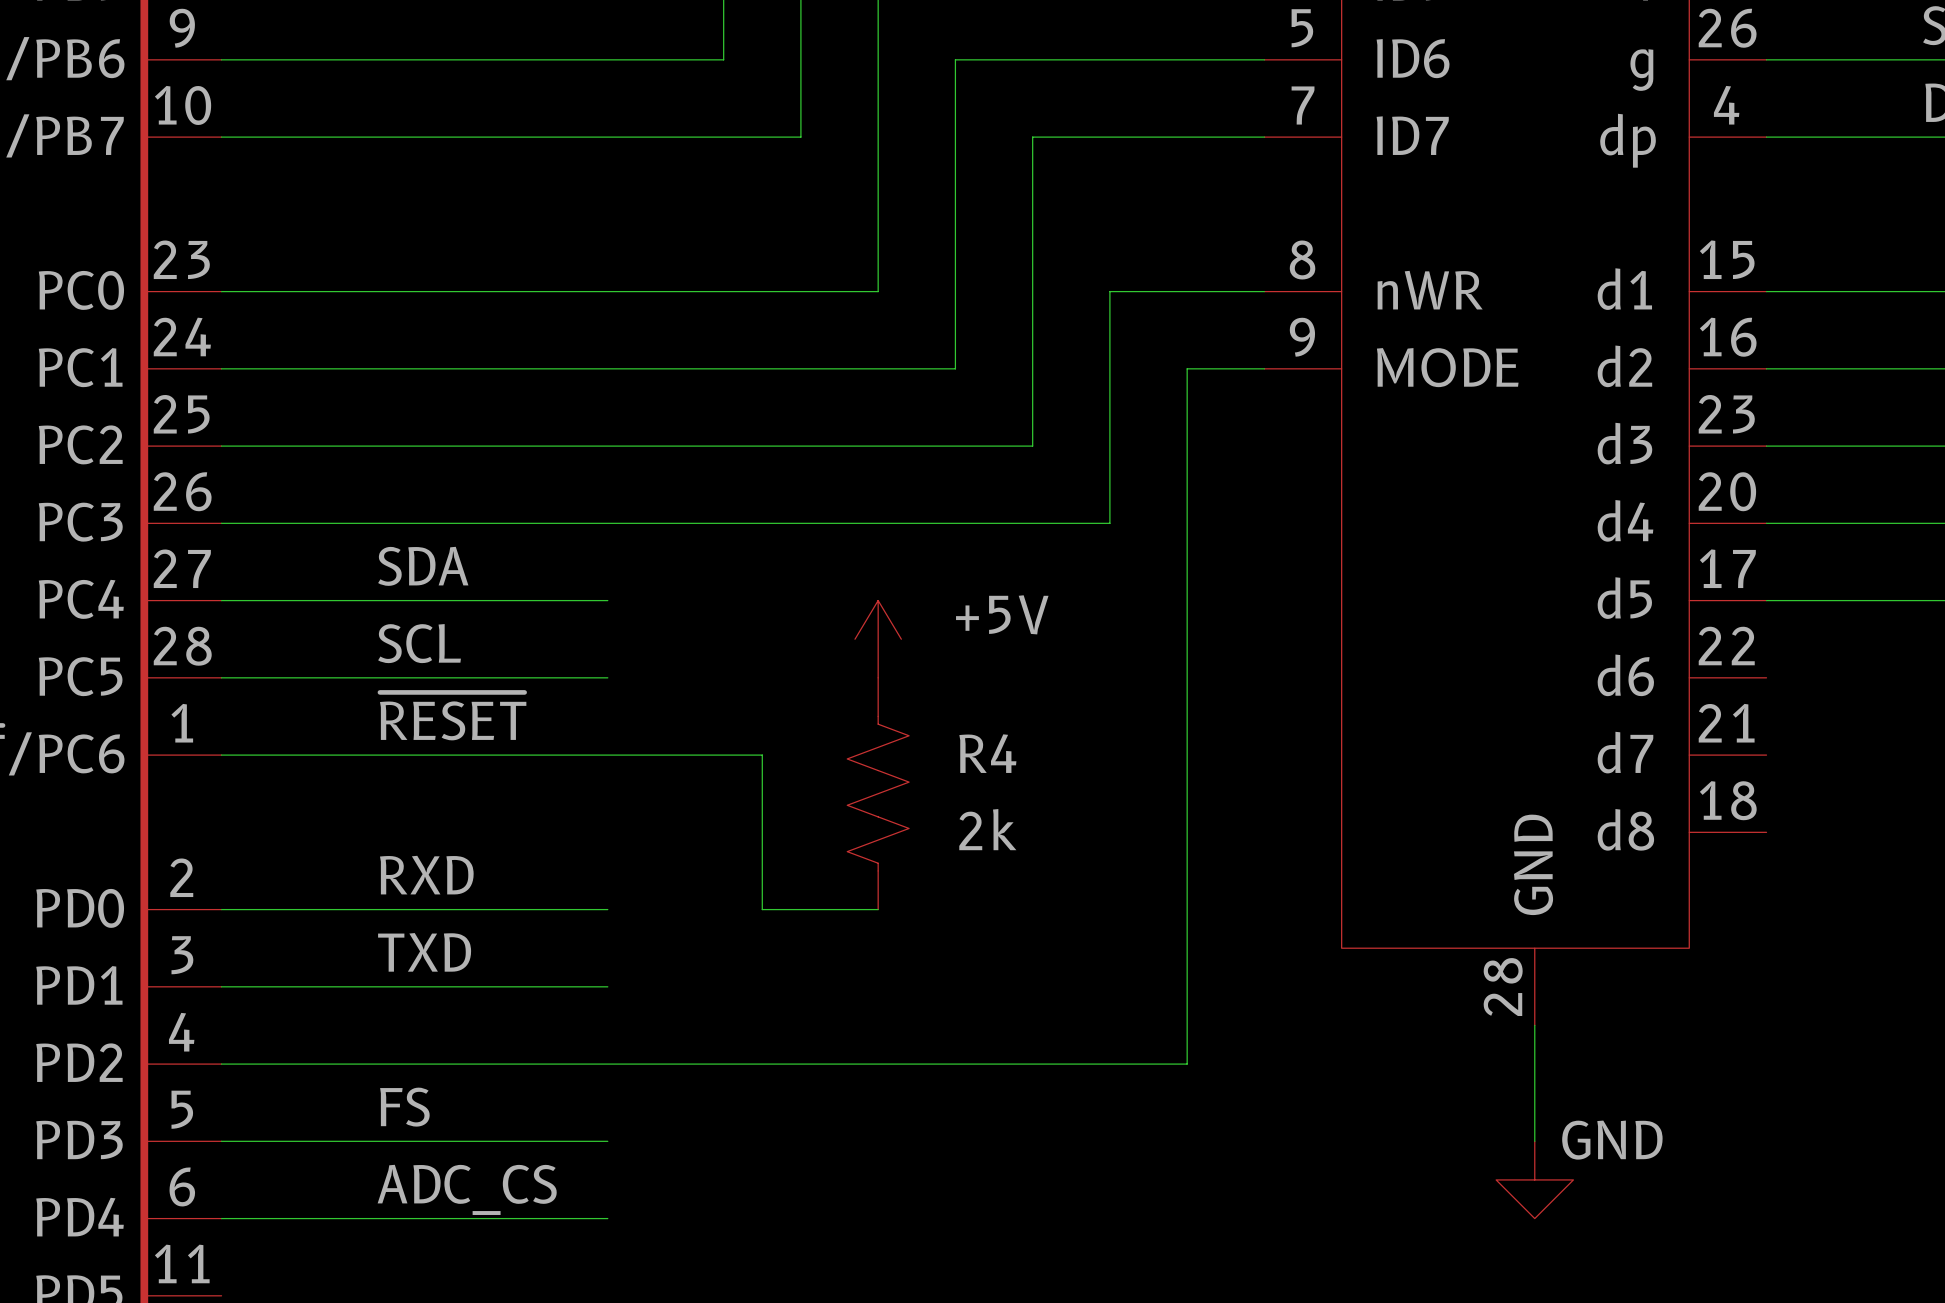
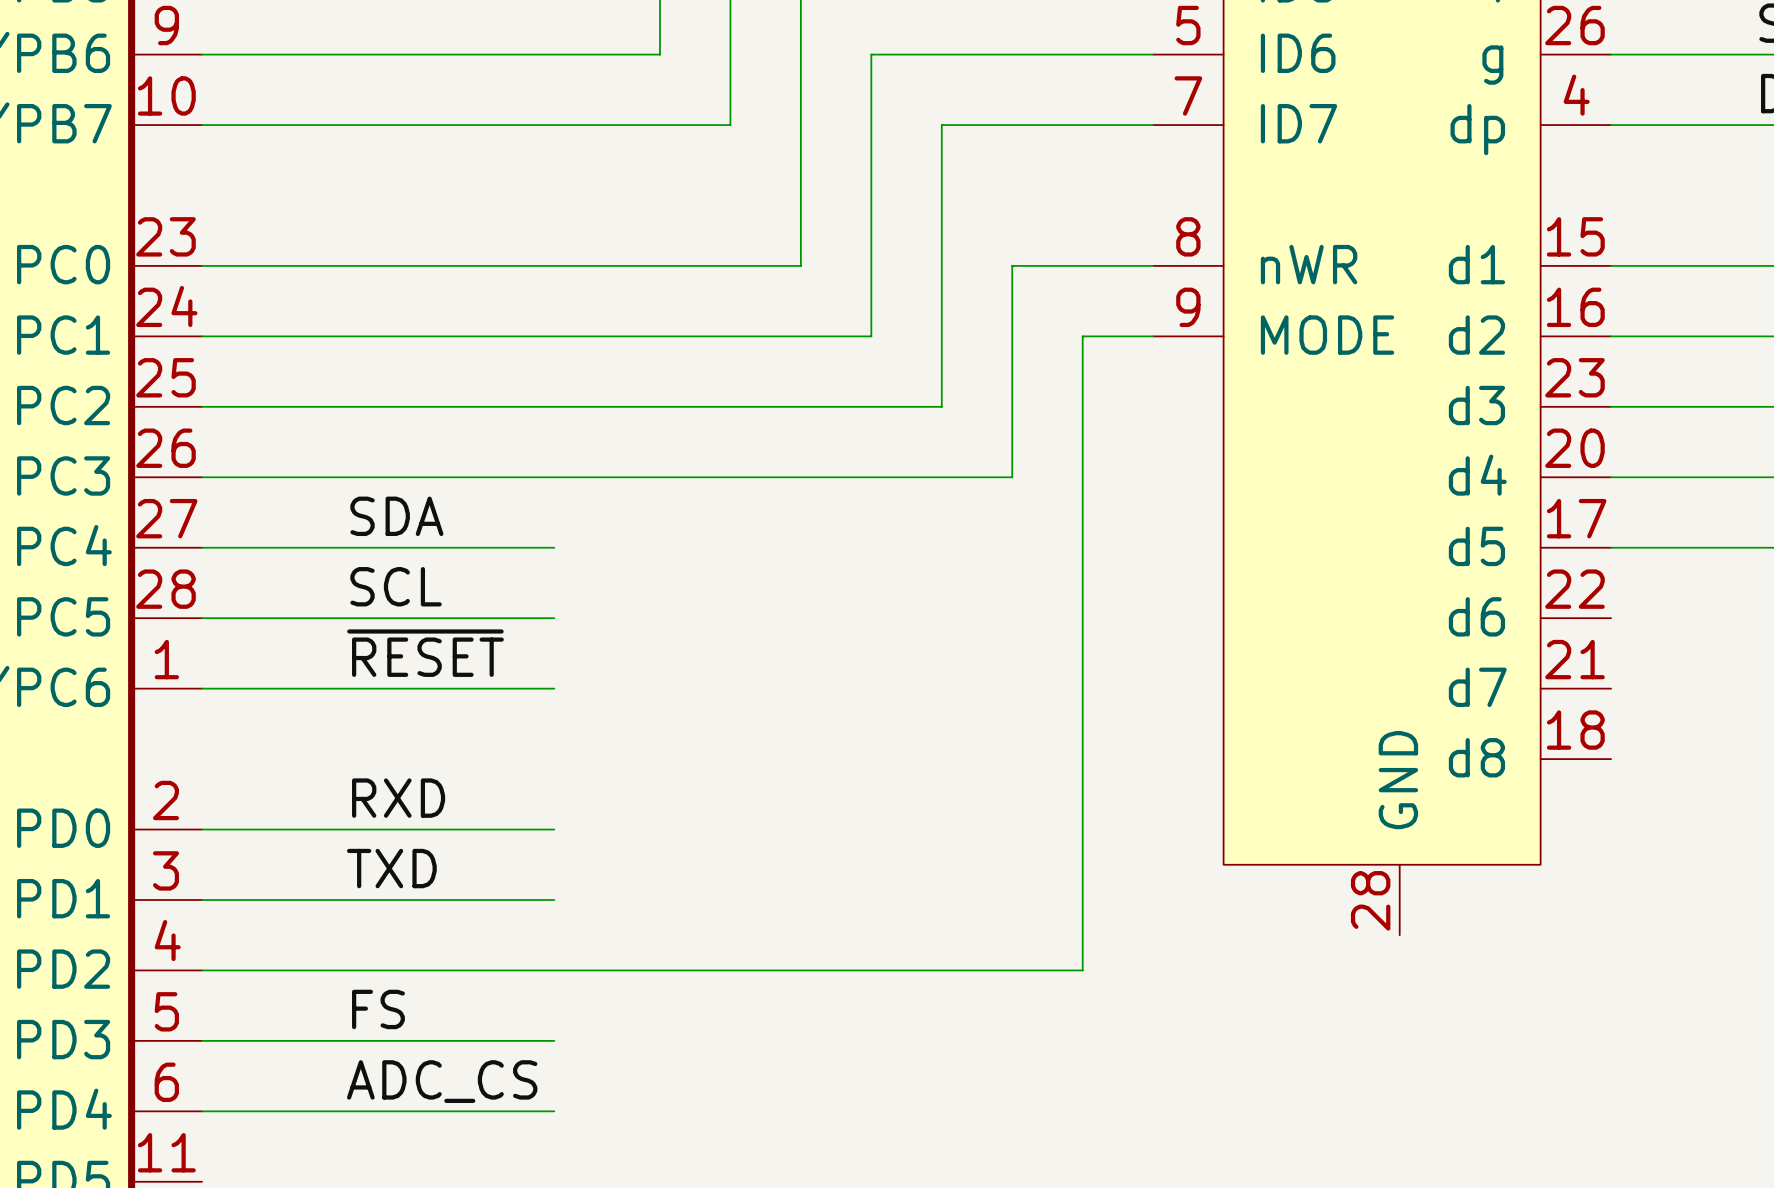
power symbol: +5V (878, 639) -> none
wire: (607, 755) (762, 755) (762, 909) (878, 909) -> none
R4: 2k (878, 793) -> none
wire: (1534, 1025) (1534, 1141) -> none
power symbol: GND (1534, 1179) -> none

